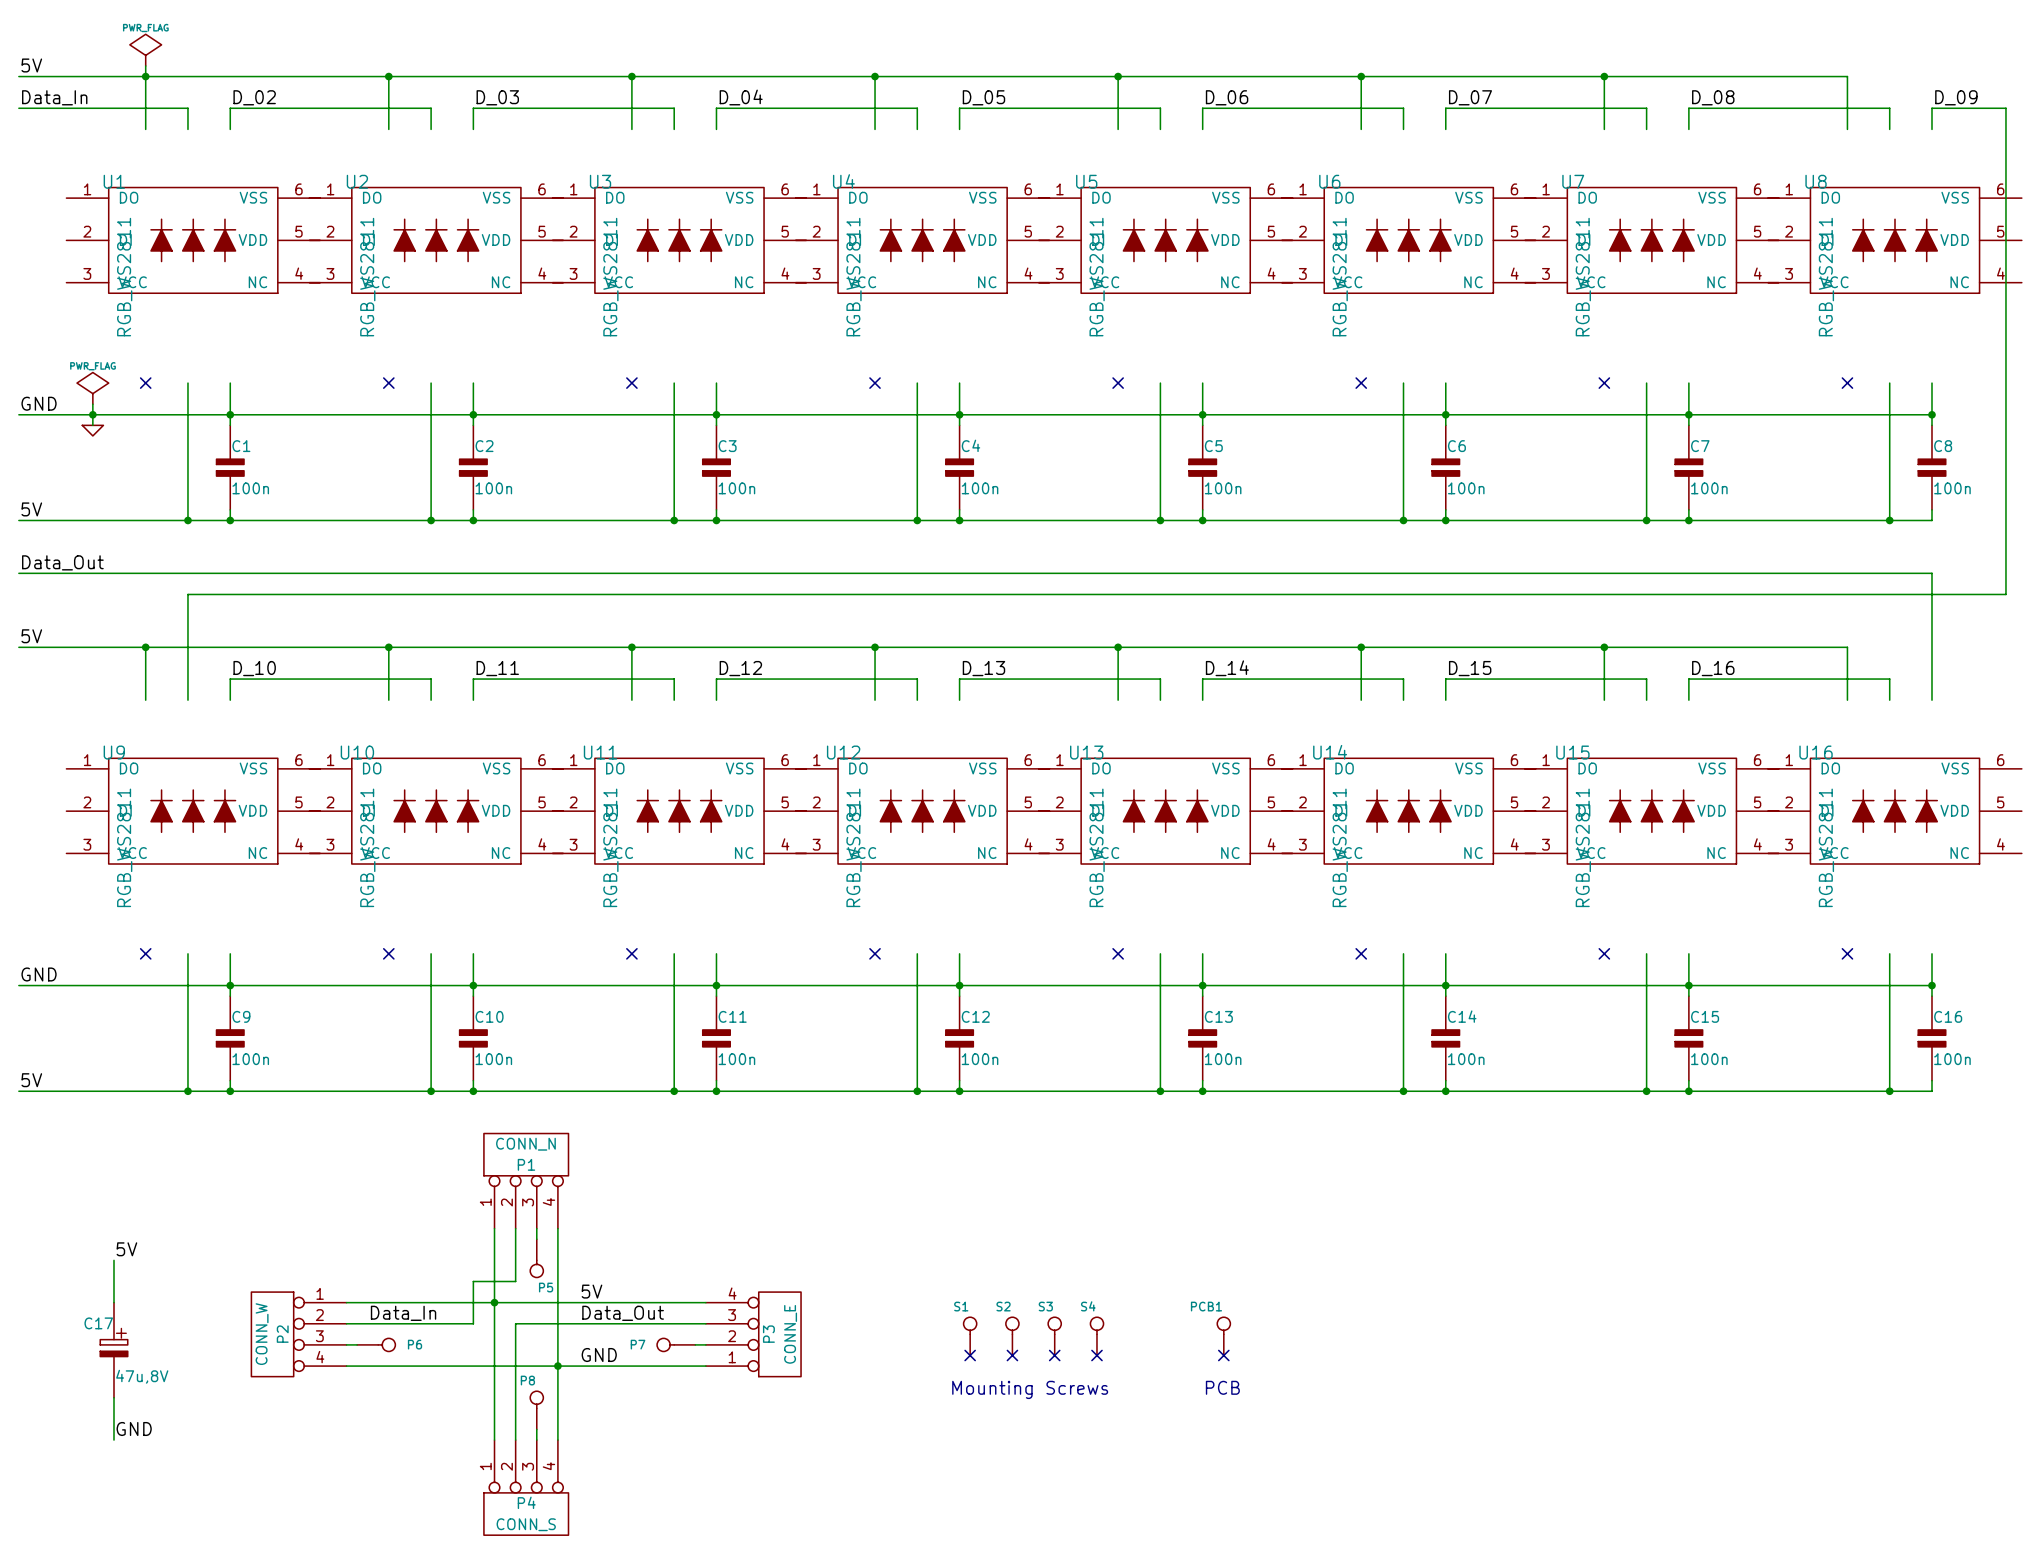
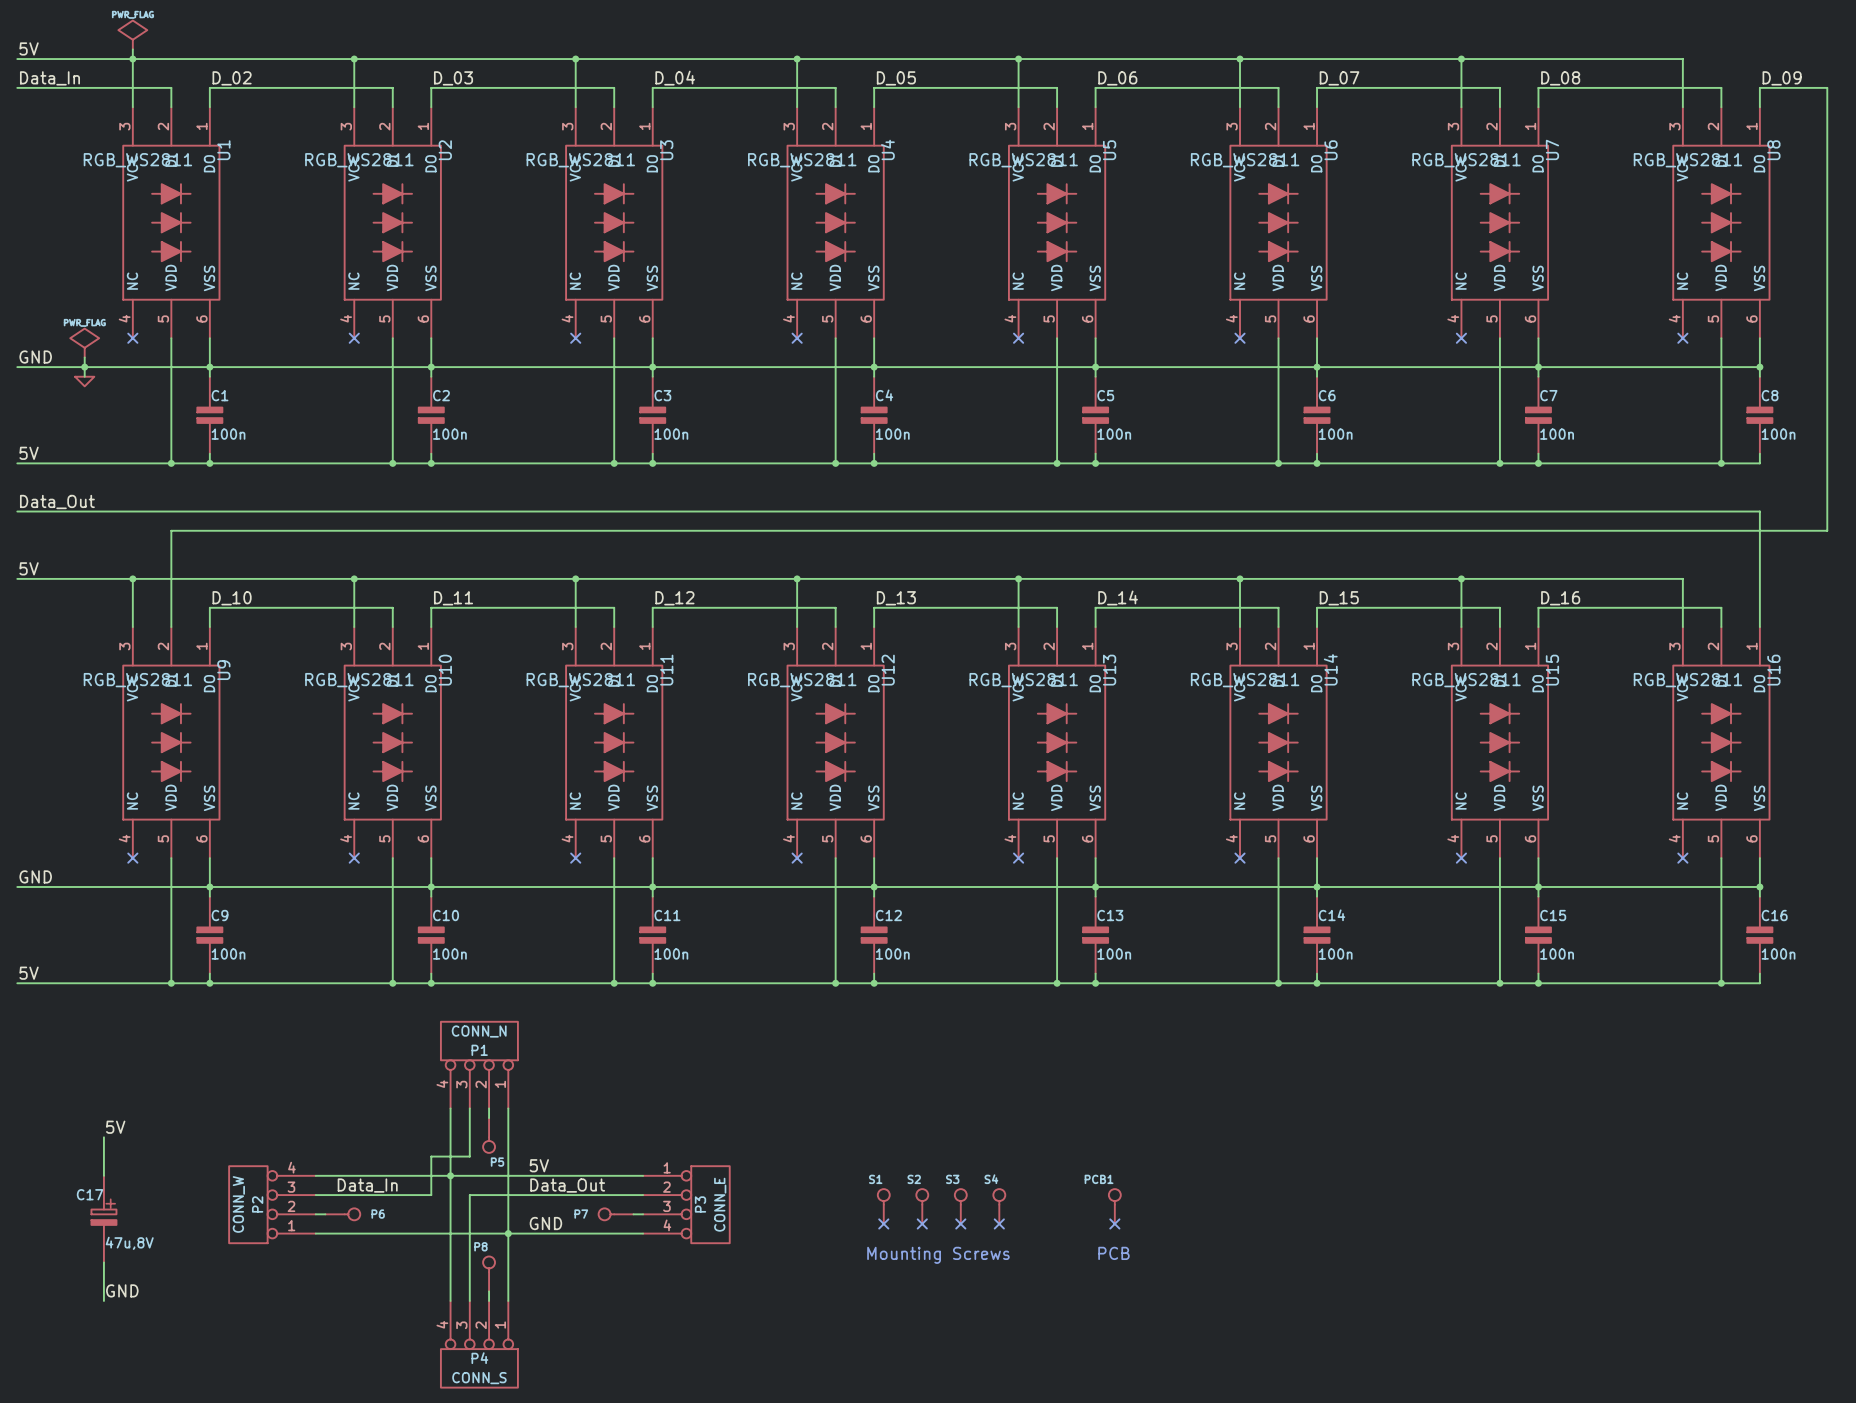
U1 rotation: 0° (193, 240) -> 90° clockwise (171, 222)
U2 rotation: 0° (436, 240) -> 90° clockwise (392, 222)
U3 rotation: 0° (679, 240) -> 90° clockwise (614, 222)
U4 rotation: 0° (922, 240) -> 90° clockwise (835, 222)
U5 rotation: 0° (1165, 240) -> 90° clockwise (1057, 222)
U6 rotation: 0° (1408, 240) -> 90° clockwise (1278, 222)
U7 rotation: 0° (1651, 240) -> 90° clockwise (1499, 222)
U8 rotation: 0° (1895, 240) -> 90° clockwise (1721, 222)
U9 rotation: 0° (193, 811) -> 90° clockwise (171, 742)
U10 rotation: 0° (436, 811) -> 90° clockwise (392, 742)
U11 rotation: 0° (679, 811) -> 90° clockwise (614, 742)
U12 rotation: 0° (922, 811) -> 90° clockwise (835, 742)
U13 rotation: 0° (1165, 811) -> 90° clockwise (1057, 742)
U14 rotation: 0° (1408, 811) -> 90° clockwise (1278, 742)
U15 rotation: 0° (1651, 811) -> 90° clockwise (1499, 742)
U16 rotation: 0° (1895, 811) -> 90° clockwise (1721, 742)
P1 flip: as is (526, 1154) -> left-right (479, 1041)
P2 flip: as is (272, 1334) -> up-down (248, 1204)
P3 flip: as is (779, 1334) -> up-down (710, 1204)
P4 flip: as is (526, 1514) -> left-right (479, 1368)

